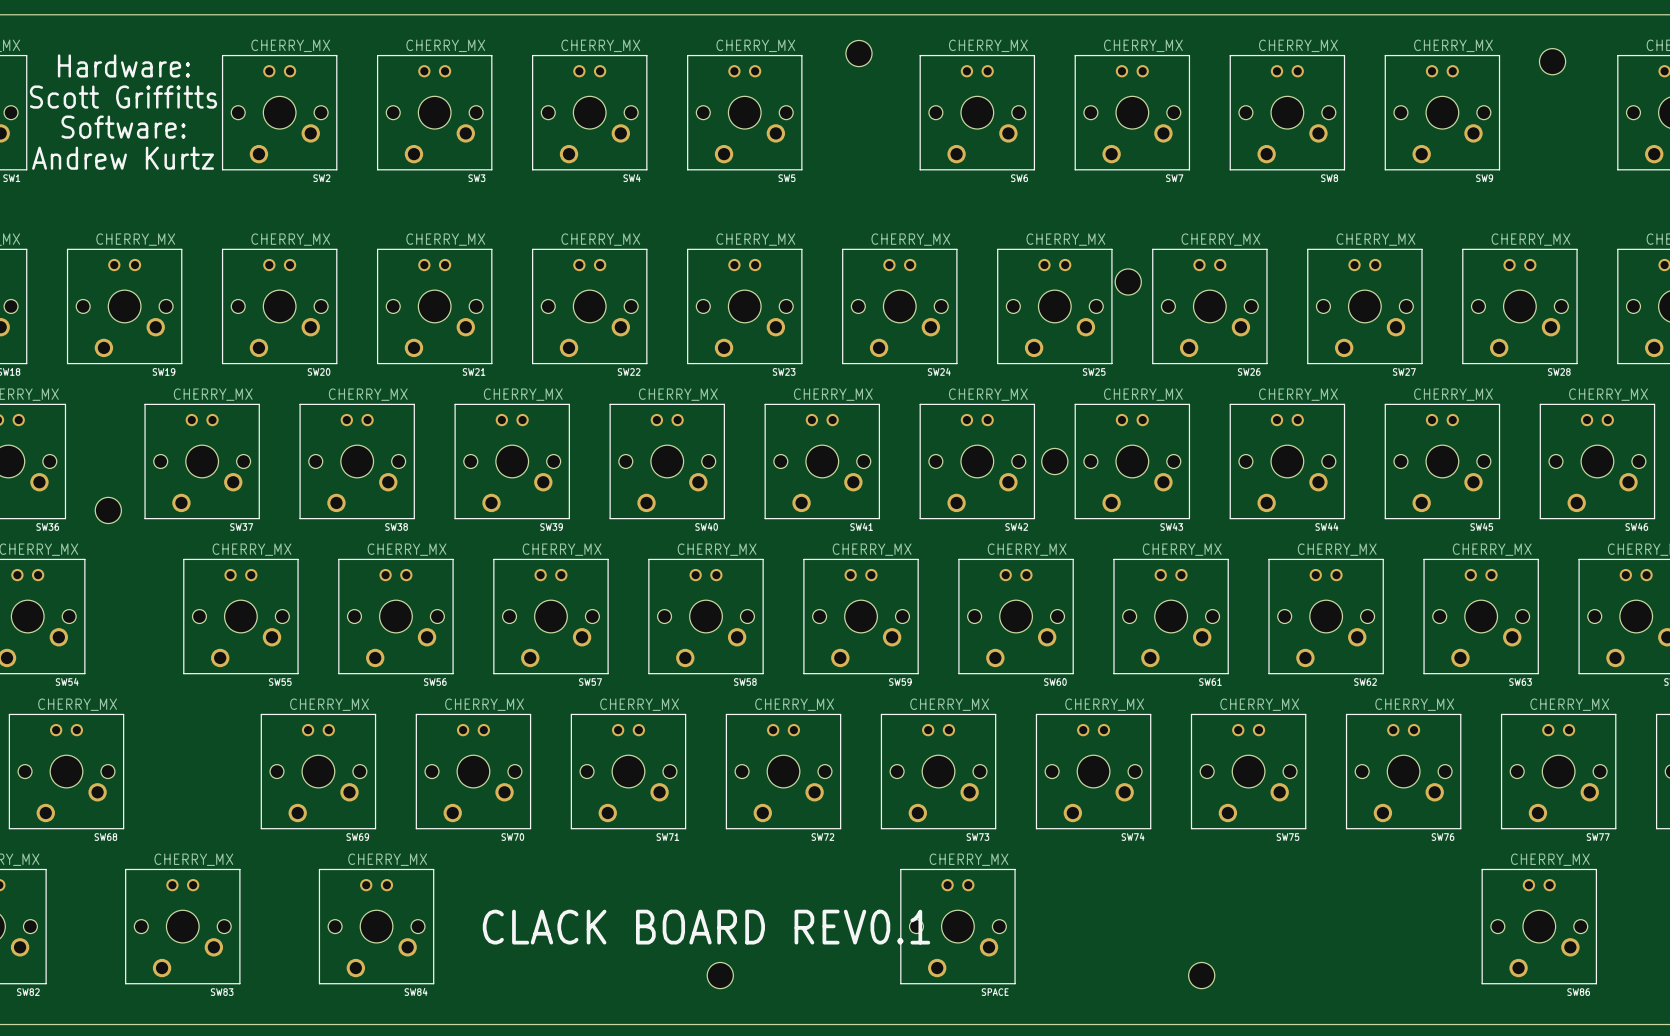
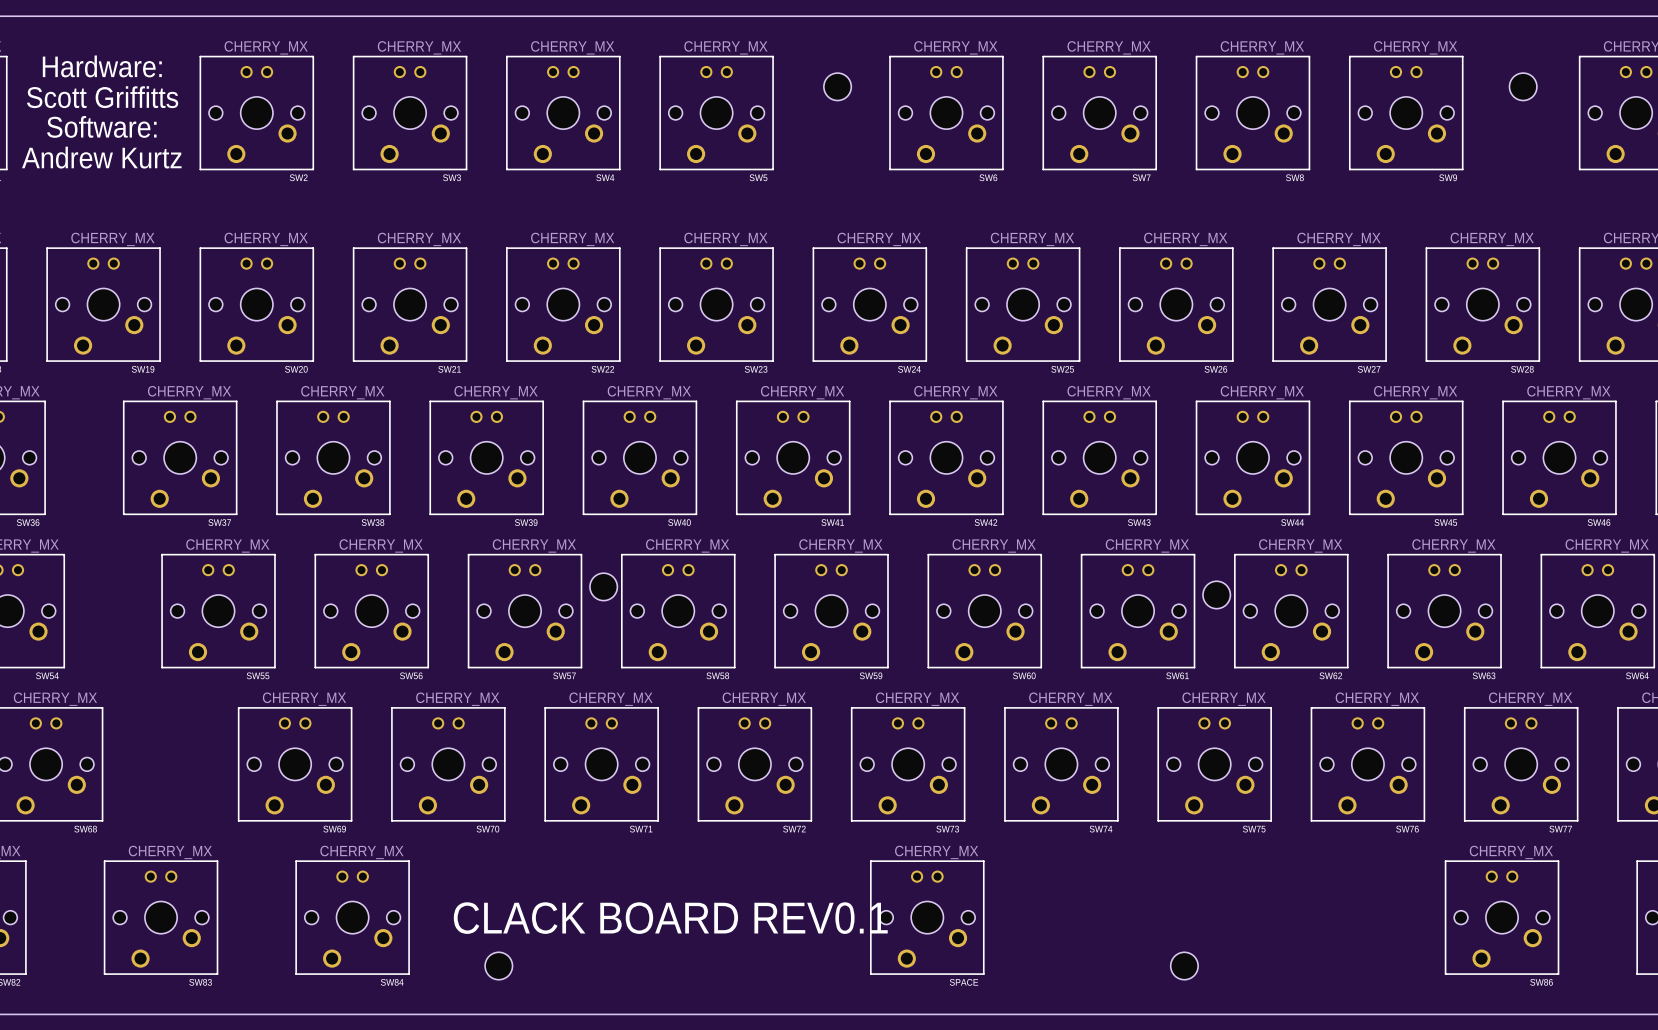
hole: (859, 53) -> none
hole: (1552, 61) -> none
hole: none -> (837, 86)
hole: none -> (1523, 86)
hole: (1128, 281) -> none
hole: (1054, 461) -> none
hole: (108, 510) -> none
hole: none -> (603, 586)
hole: none -> (1216, 594)
hole: none -> (498, 966)
hole: (720, 975) -> none
hole: (1201, 975) -> none
hole: none -> (1184, 966)

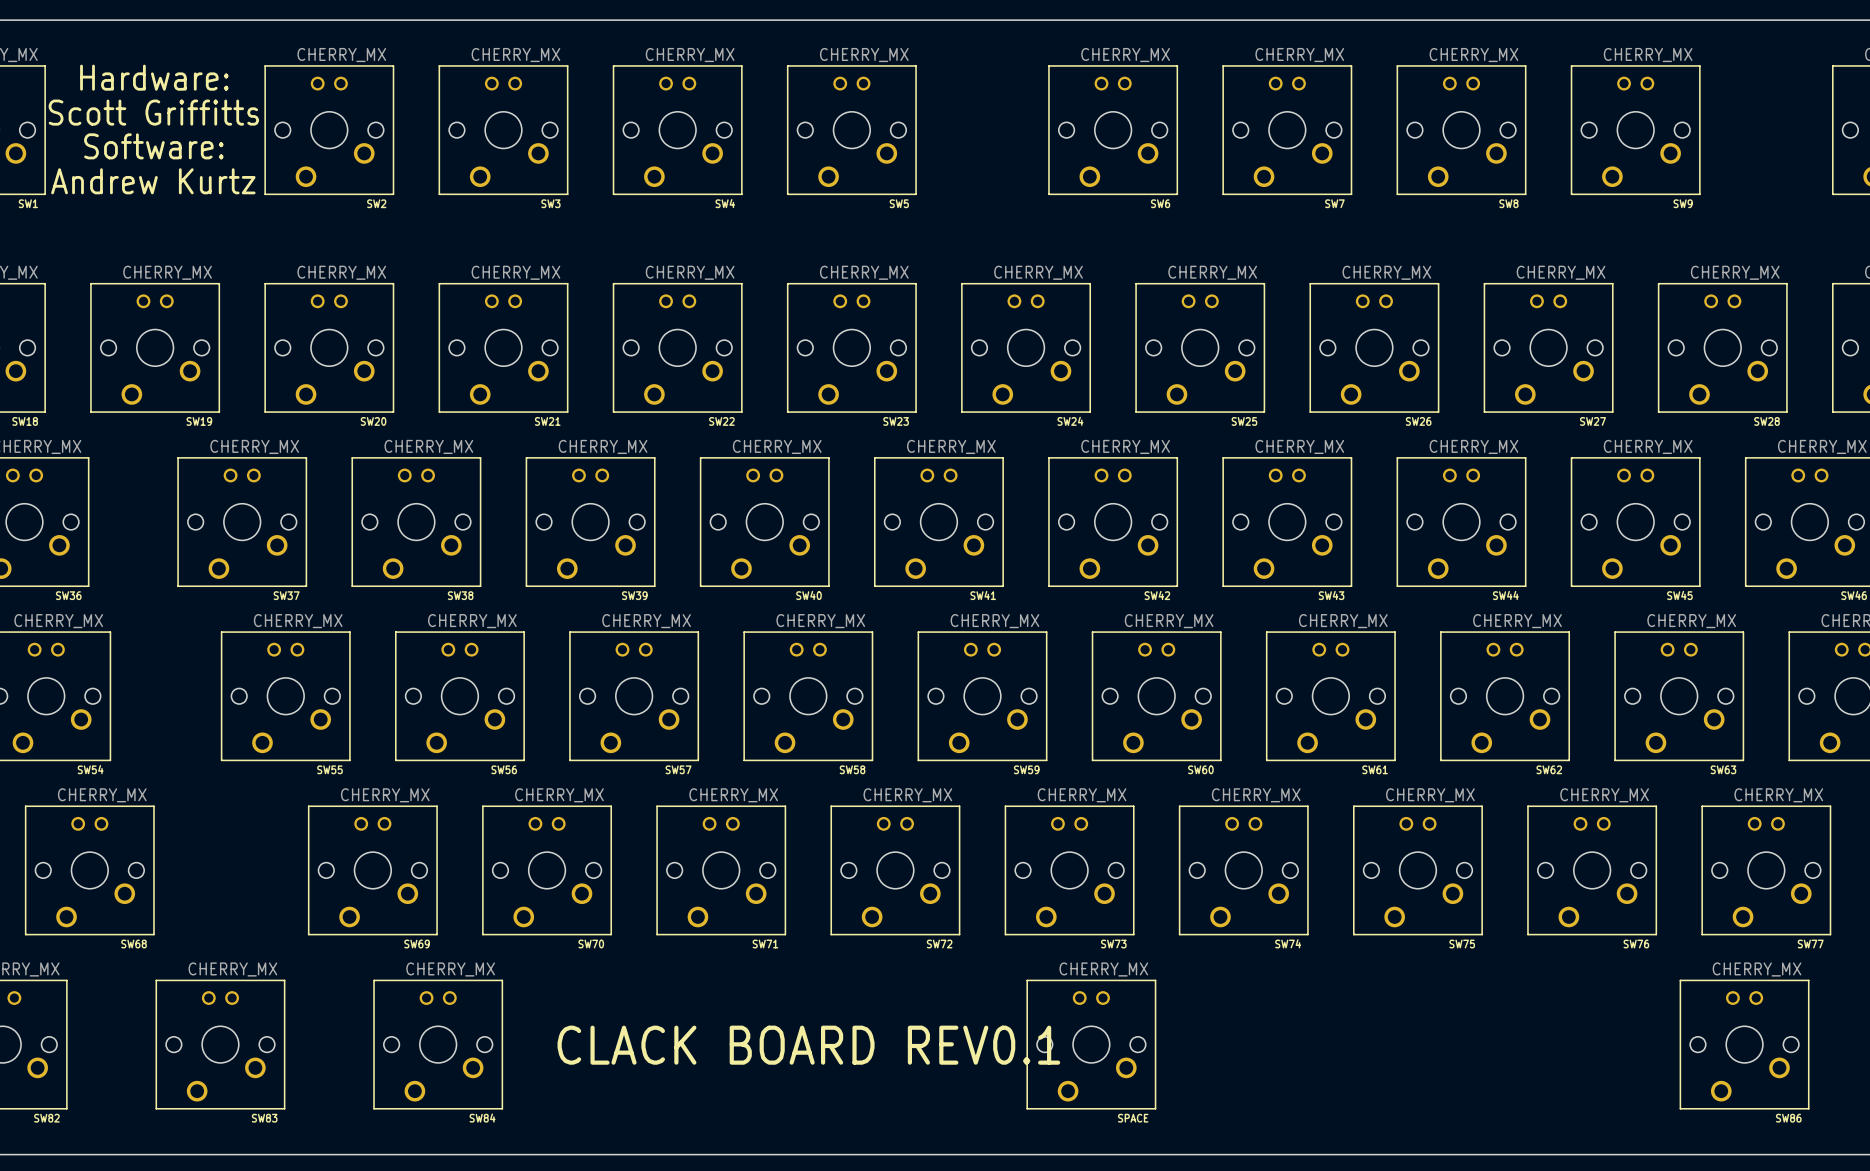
hole: (837, 86) -> none
hole: (1523, 86) -> none
hole: (603, 586) -> none
hole: (1216, 594) -> none
hole: (498, 966) -> none
hole: (1184, 966) -> none

